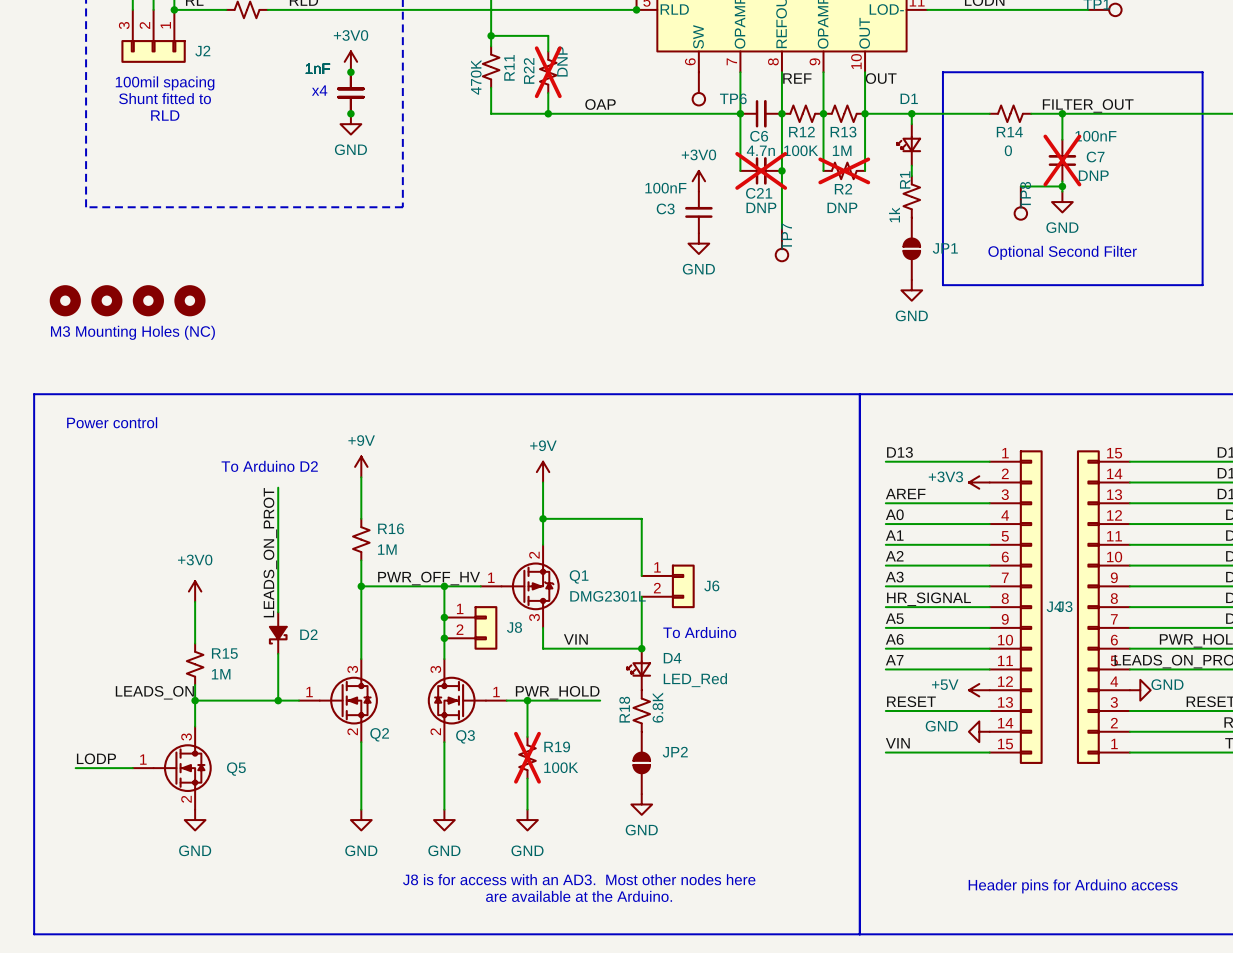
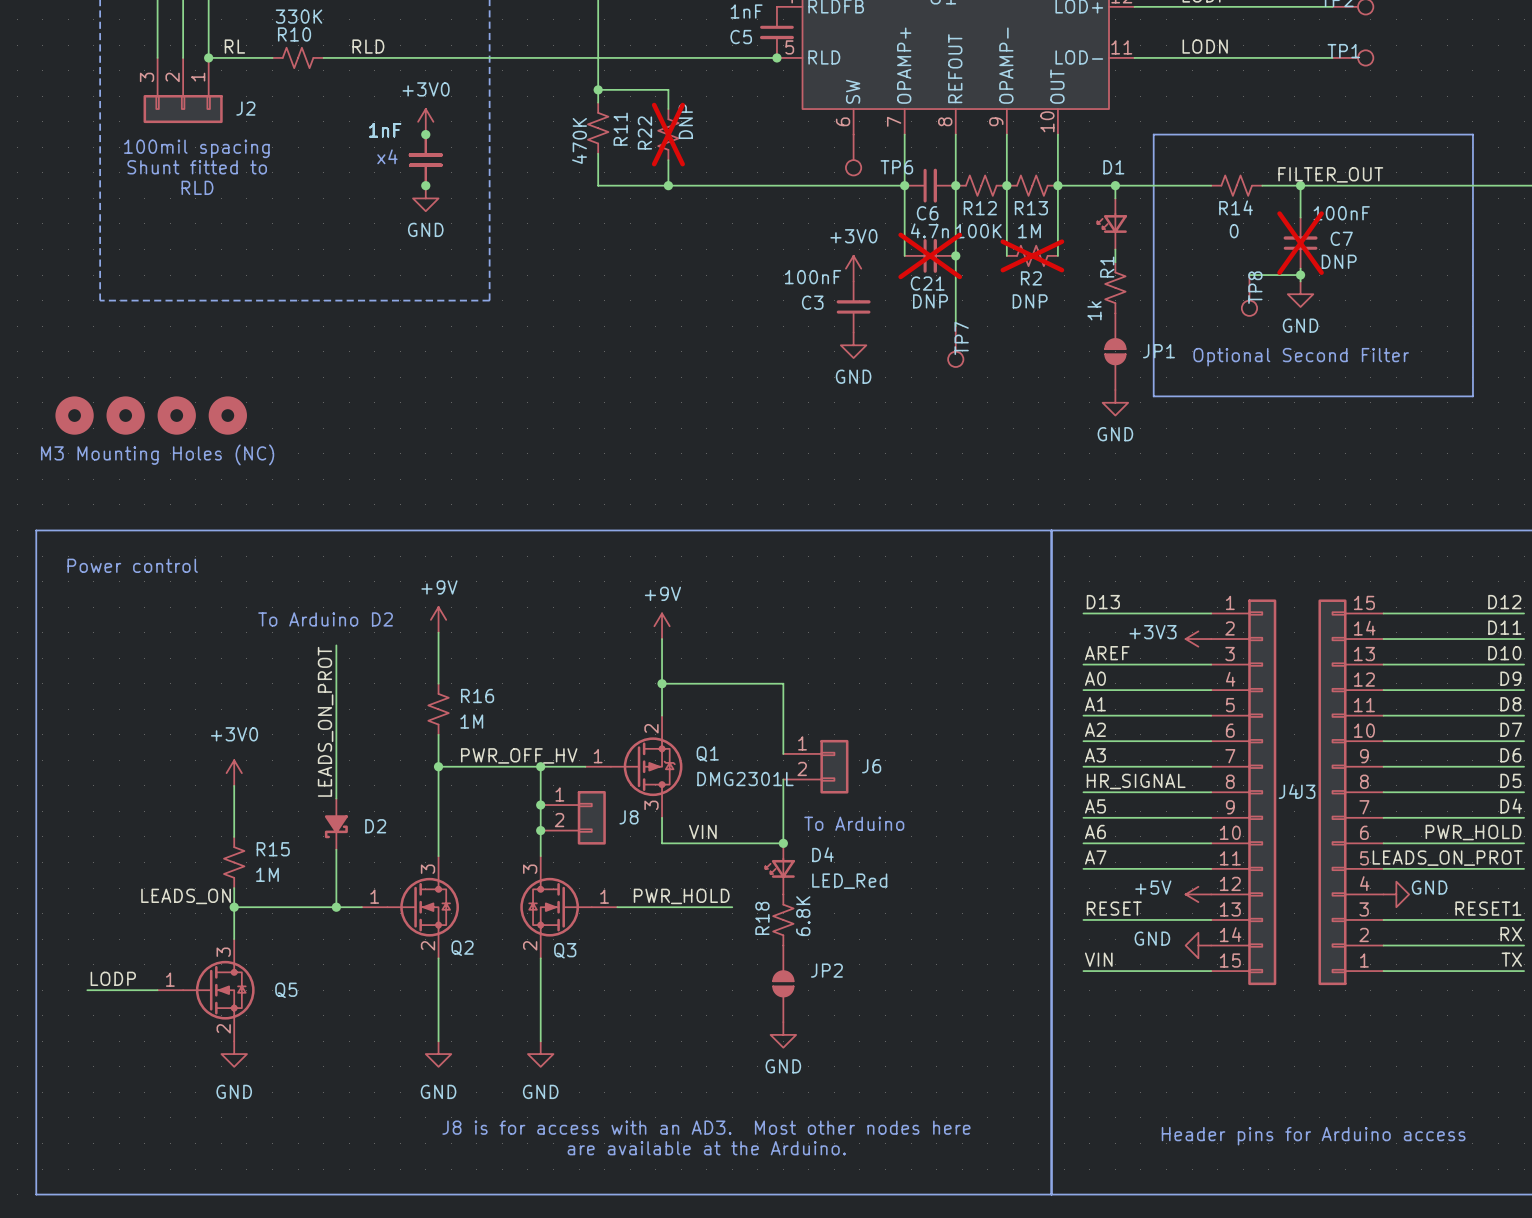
label: REF (797, 78) -> none
label: OUT (881, 78) -> none
label: OAP (600, 104) -> none
wire: (527, 700) (527, 736) -> none
junction: (527, 700) -> none
R19: 100K (527, 757) -> none
wire: (527, 778) (527, 809) -> none
power symbol: GND (527, 820) -> none

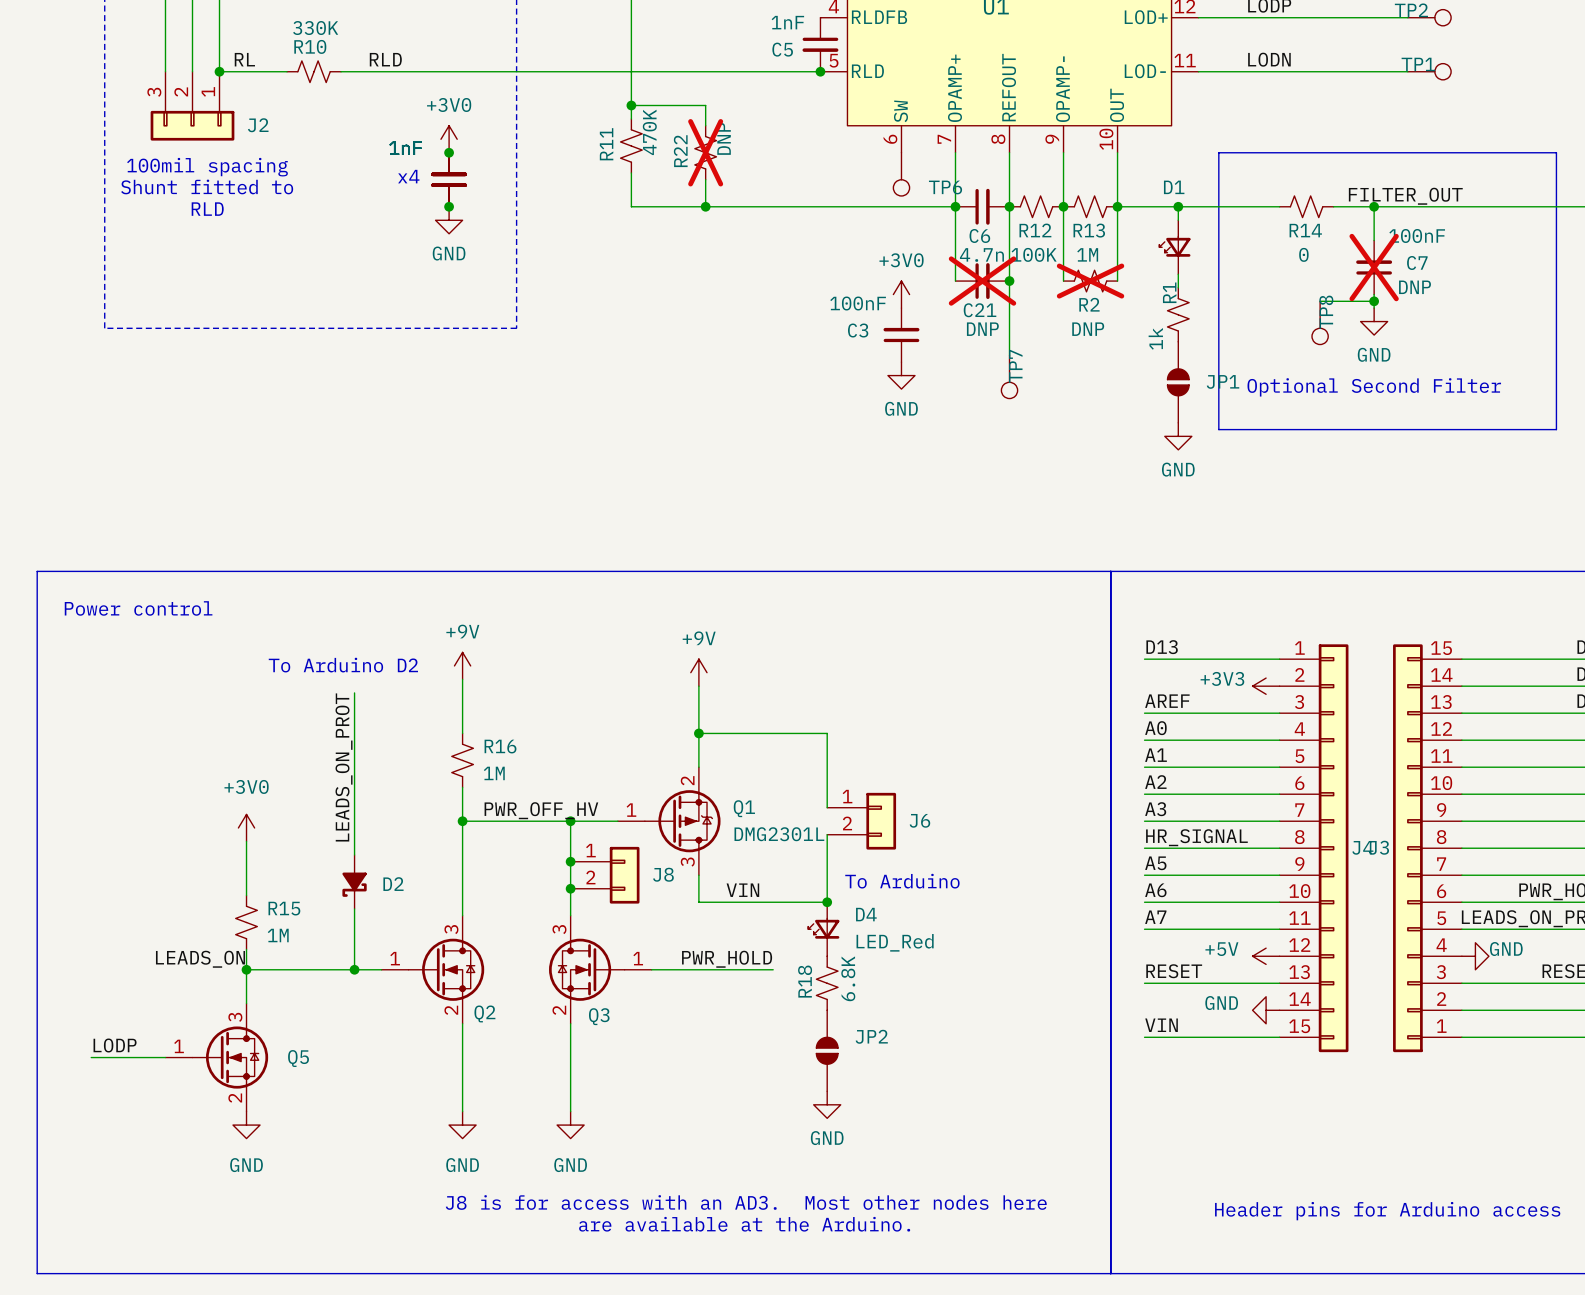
R11 name position: R11 (620, 129) -> R11 (606, 144)
R11 value position: 470K (579, 140) -> 470K (649, 132)
part: (74, 415) -> none
part: (125, 415) -> none
part: (176, 415) -> none
part: (227, 415) -> none
text: M3 Mounting Holes (NC) (157, 454) -> none

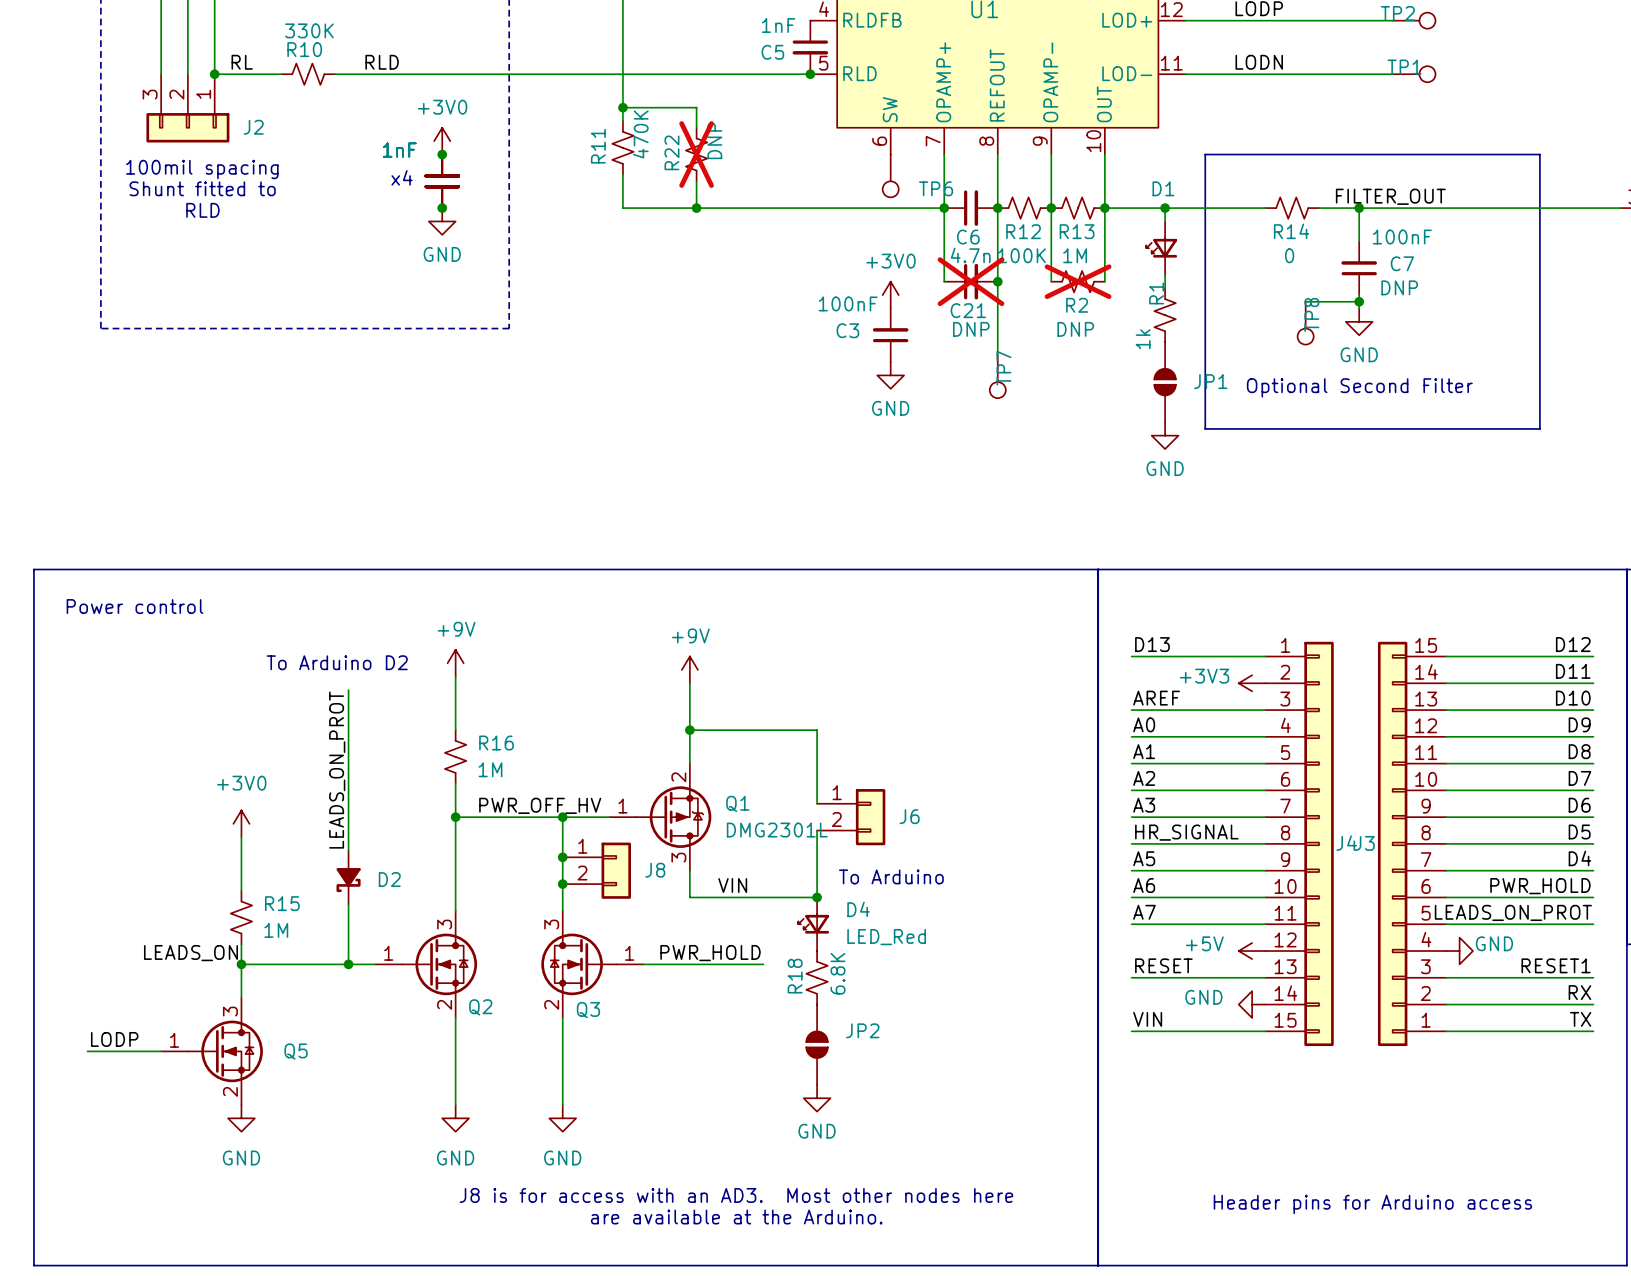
C7 do-not-place cross: (1374, 267) -> none

